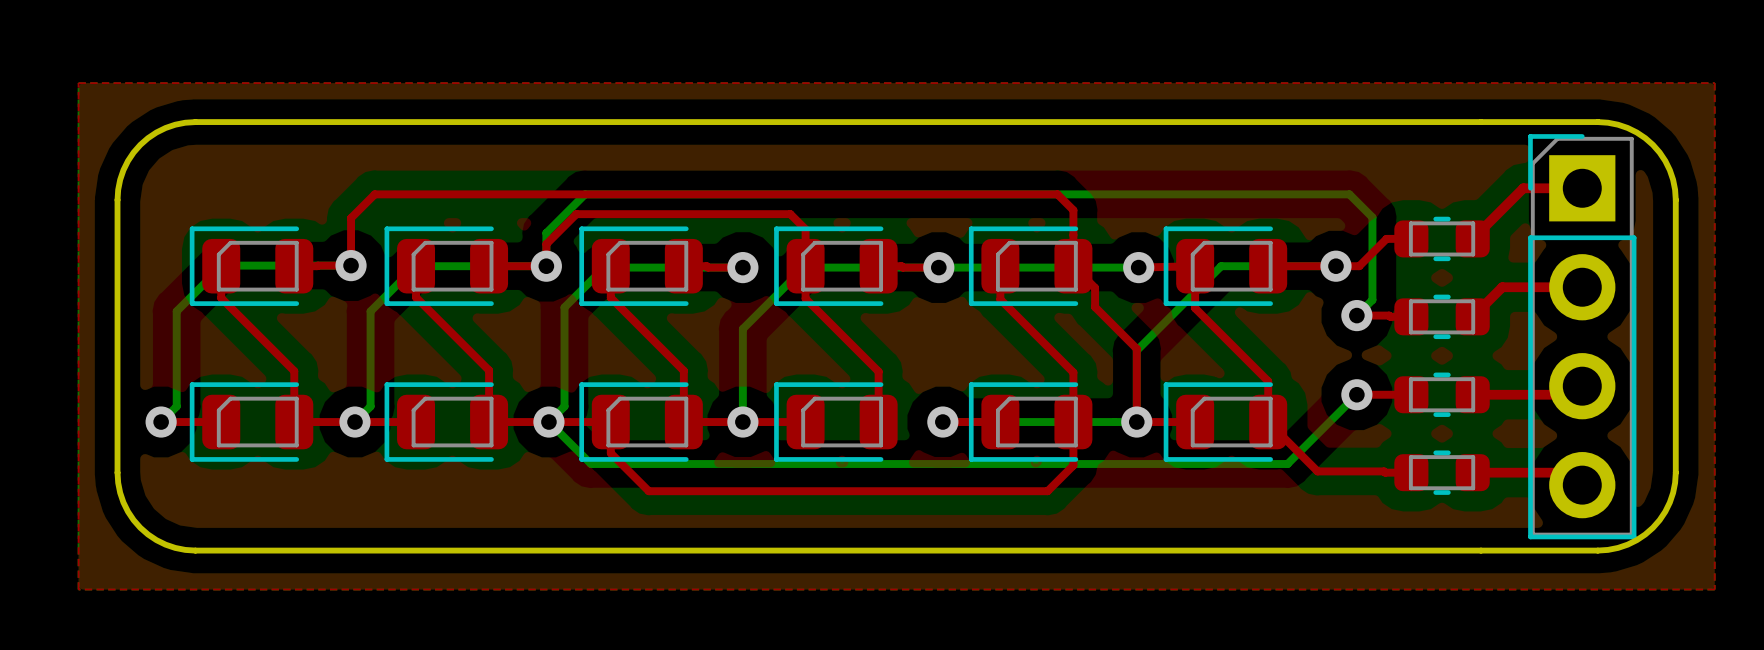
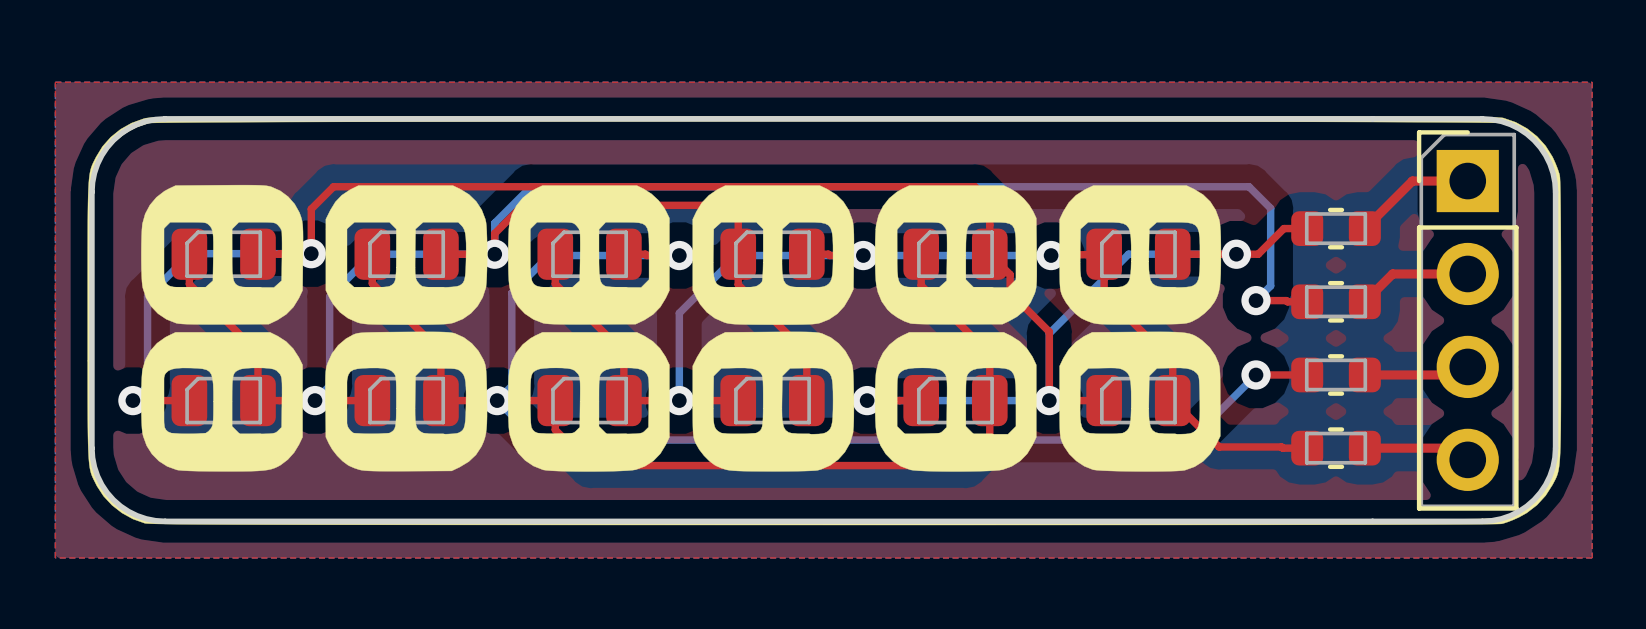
drawing: none -> [87, 116, 1562, 526]

